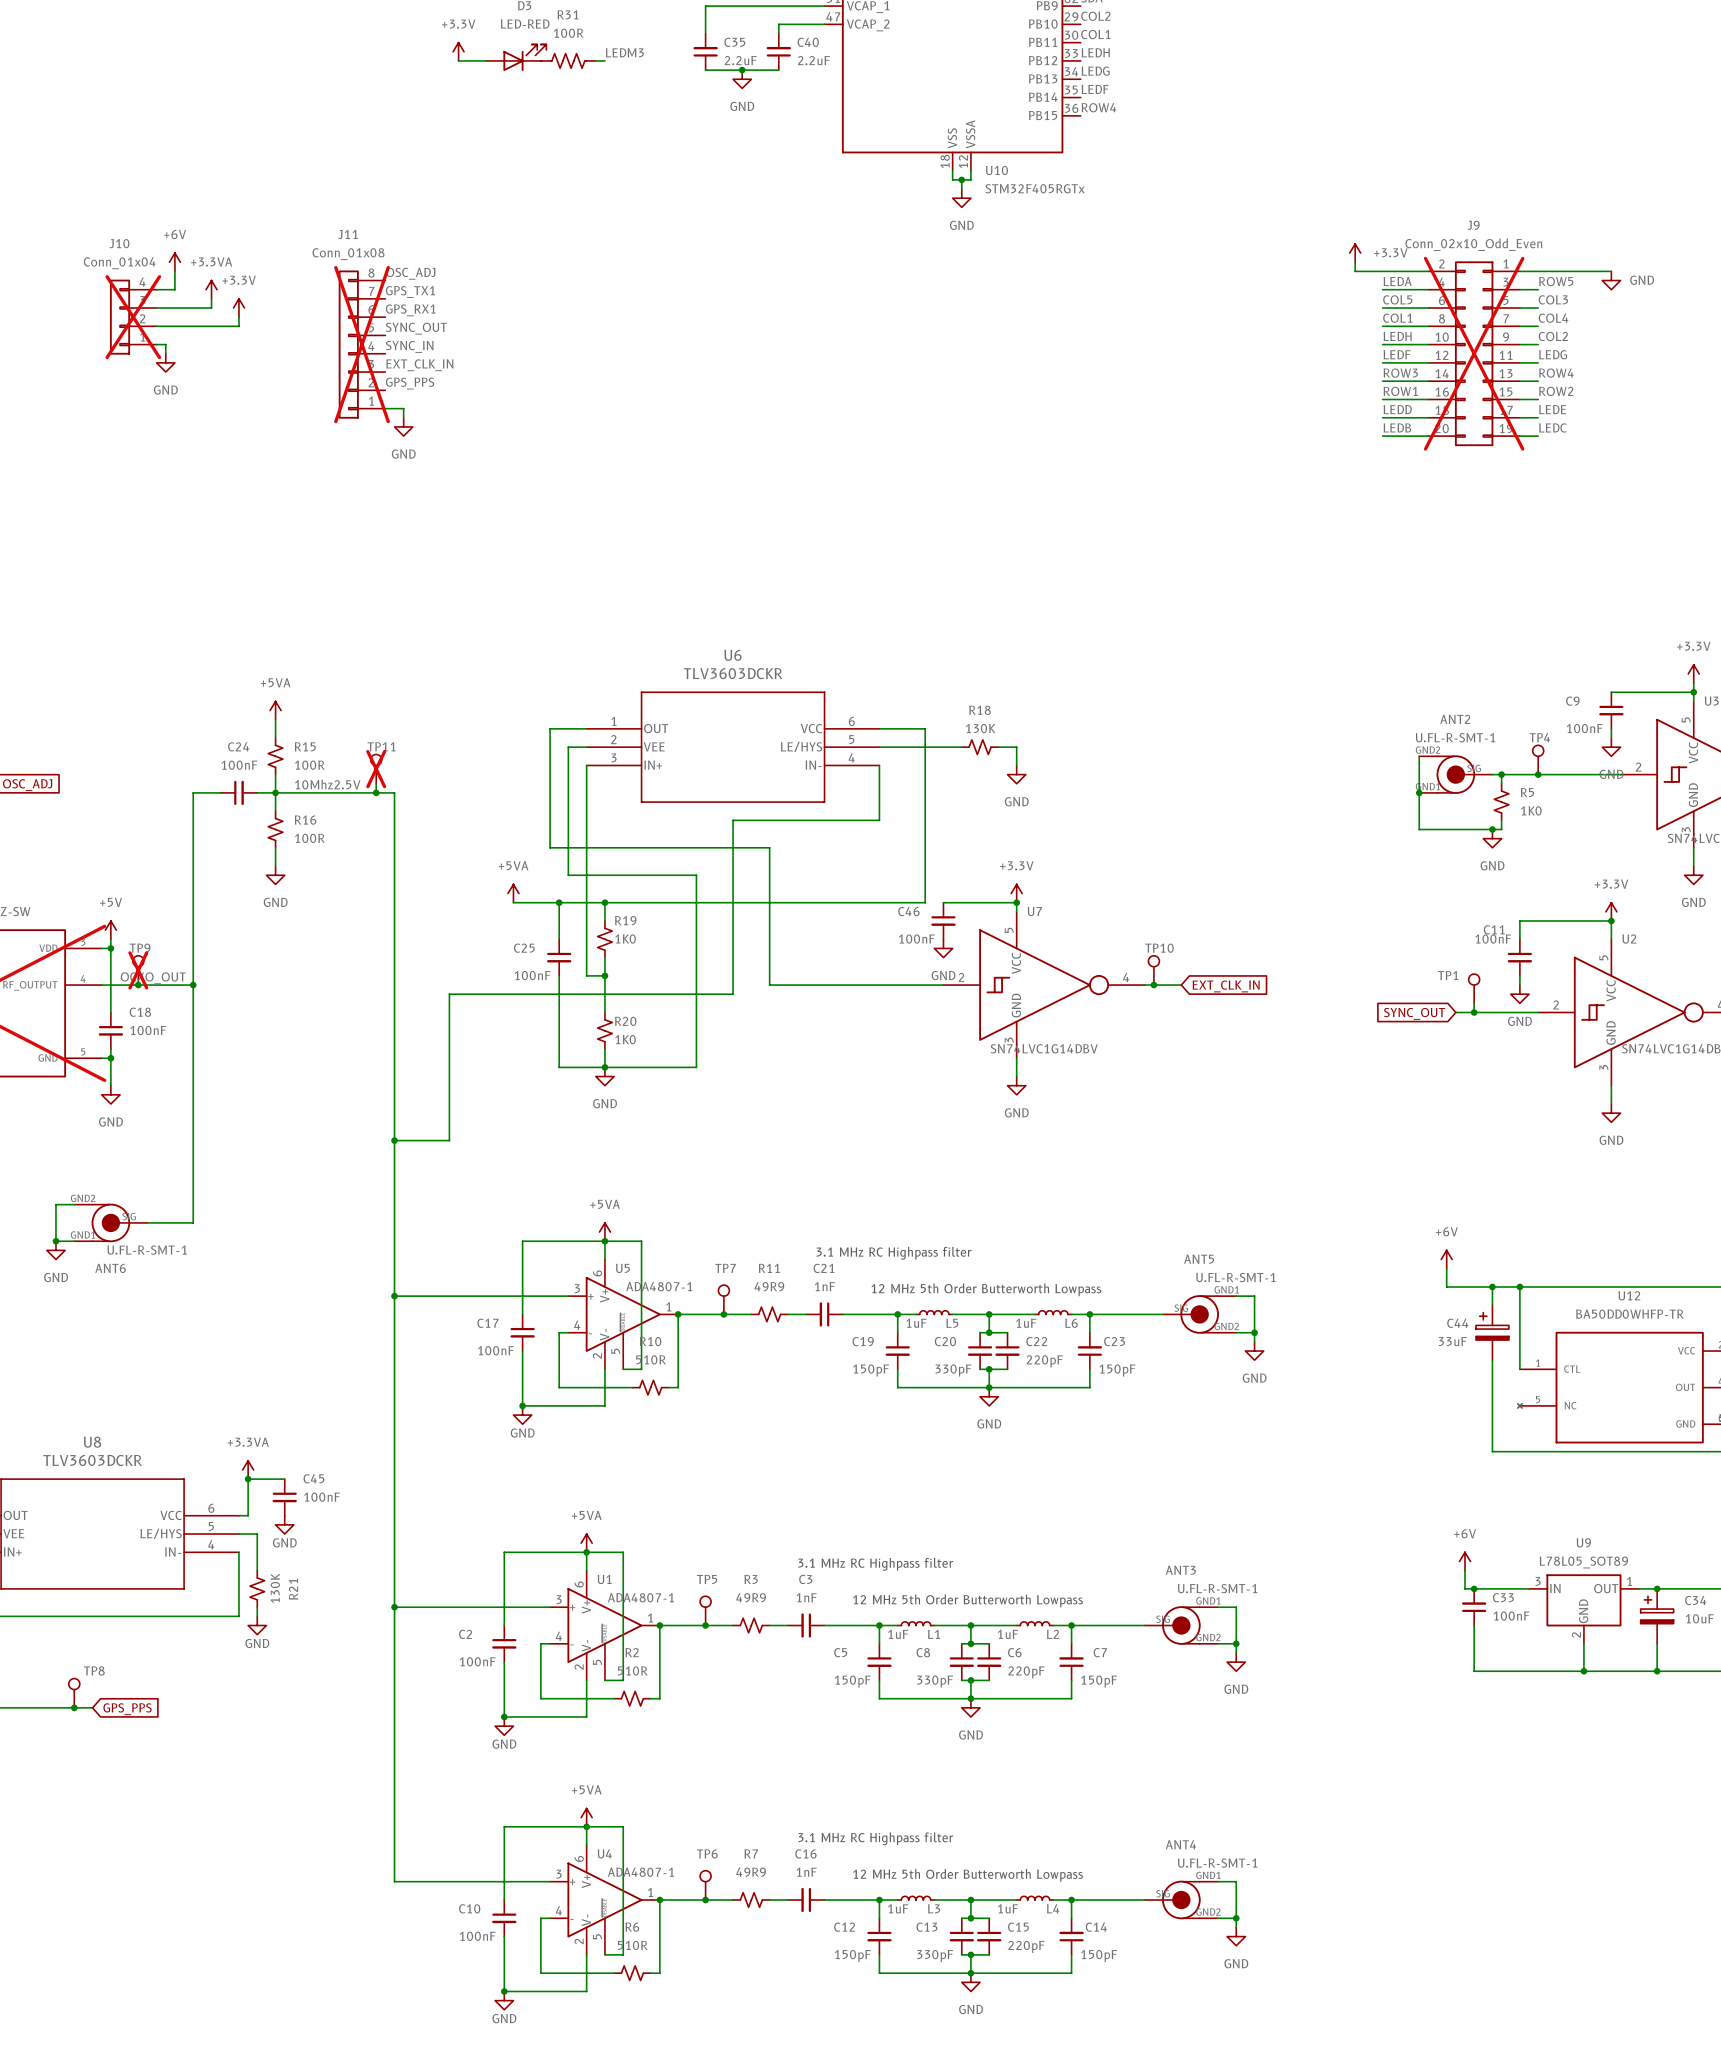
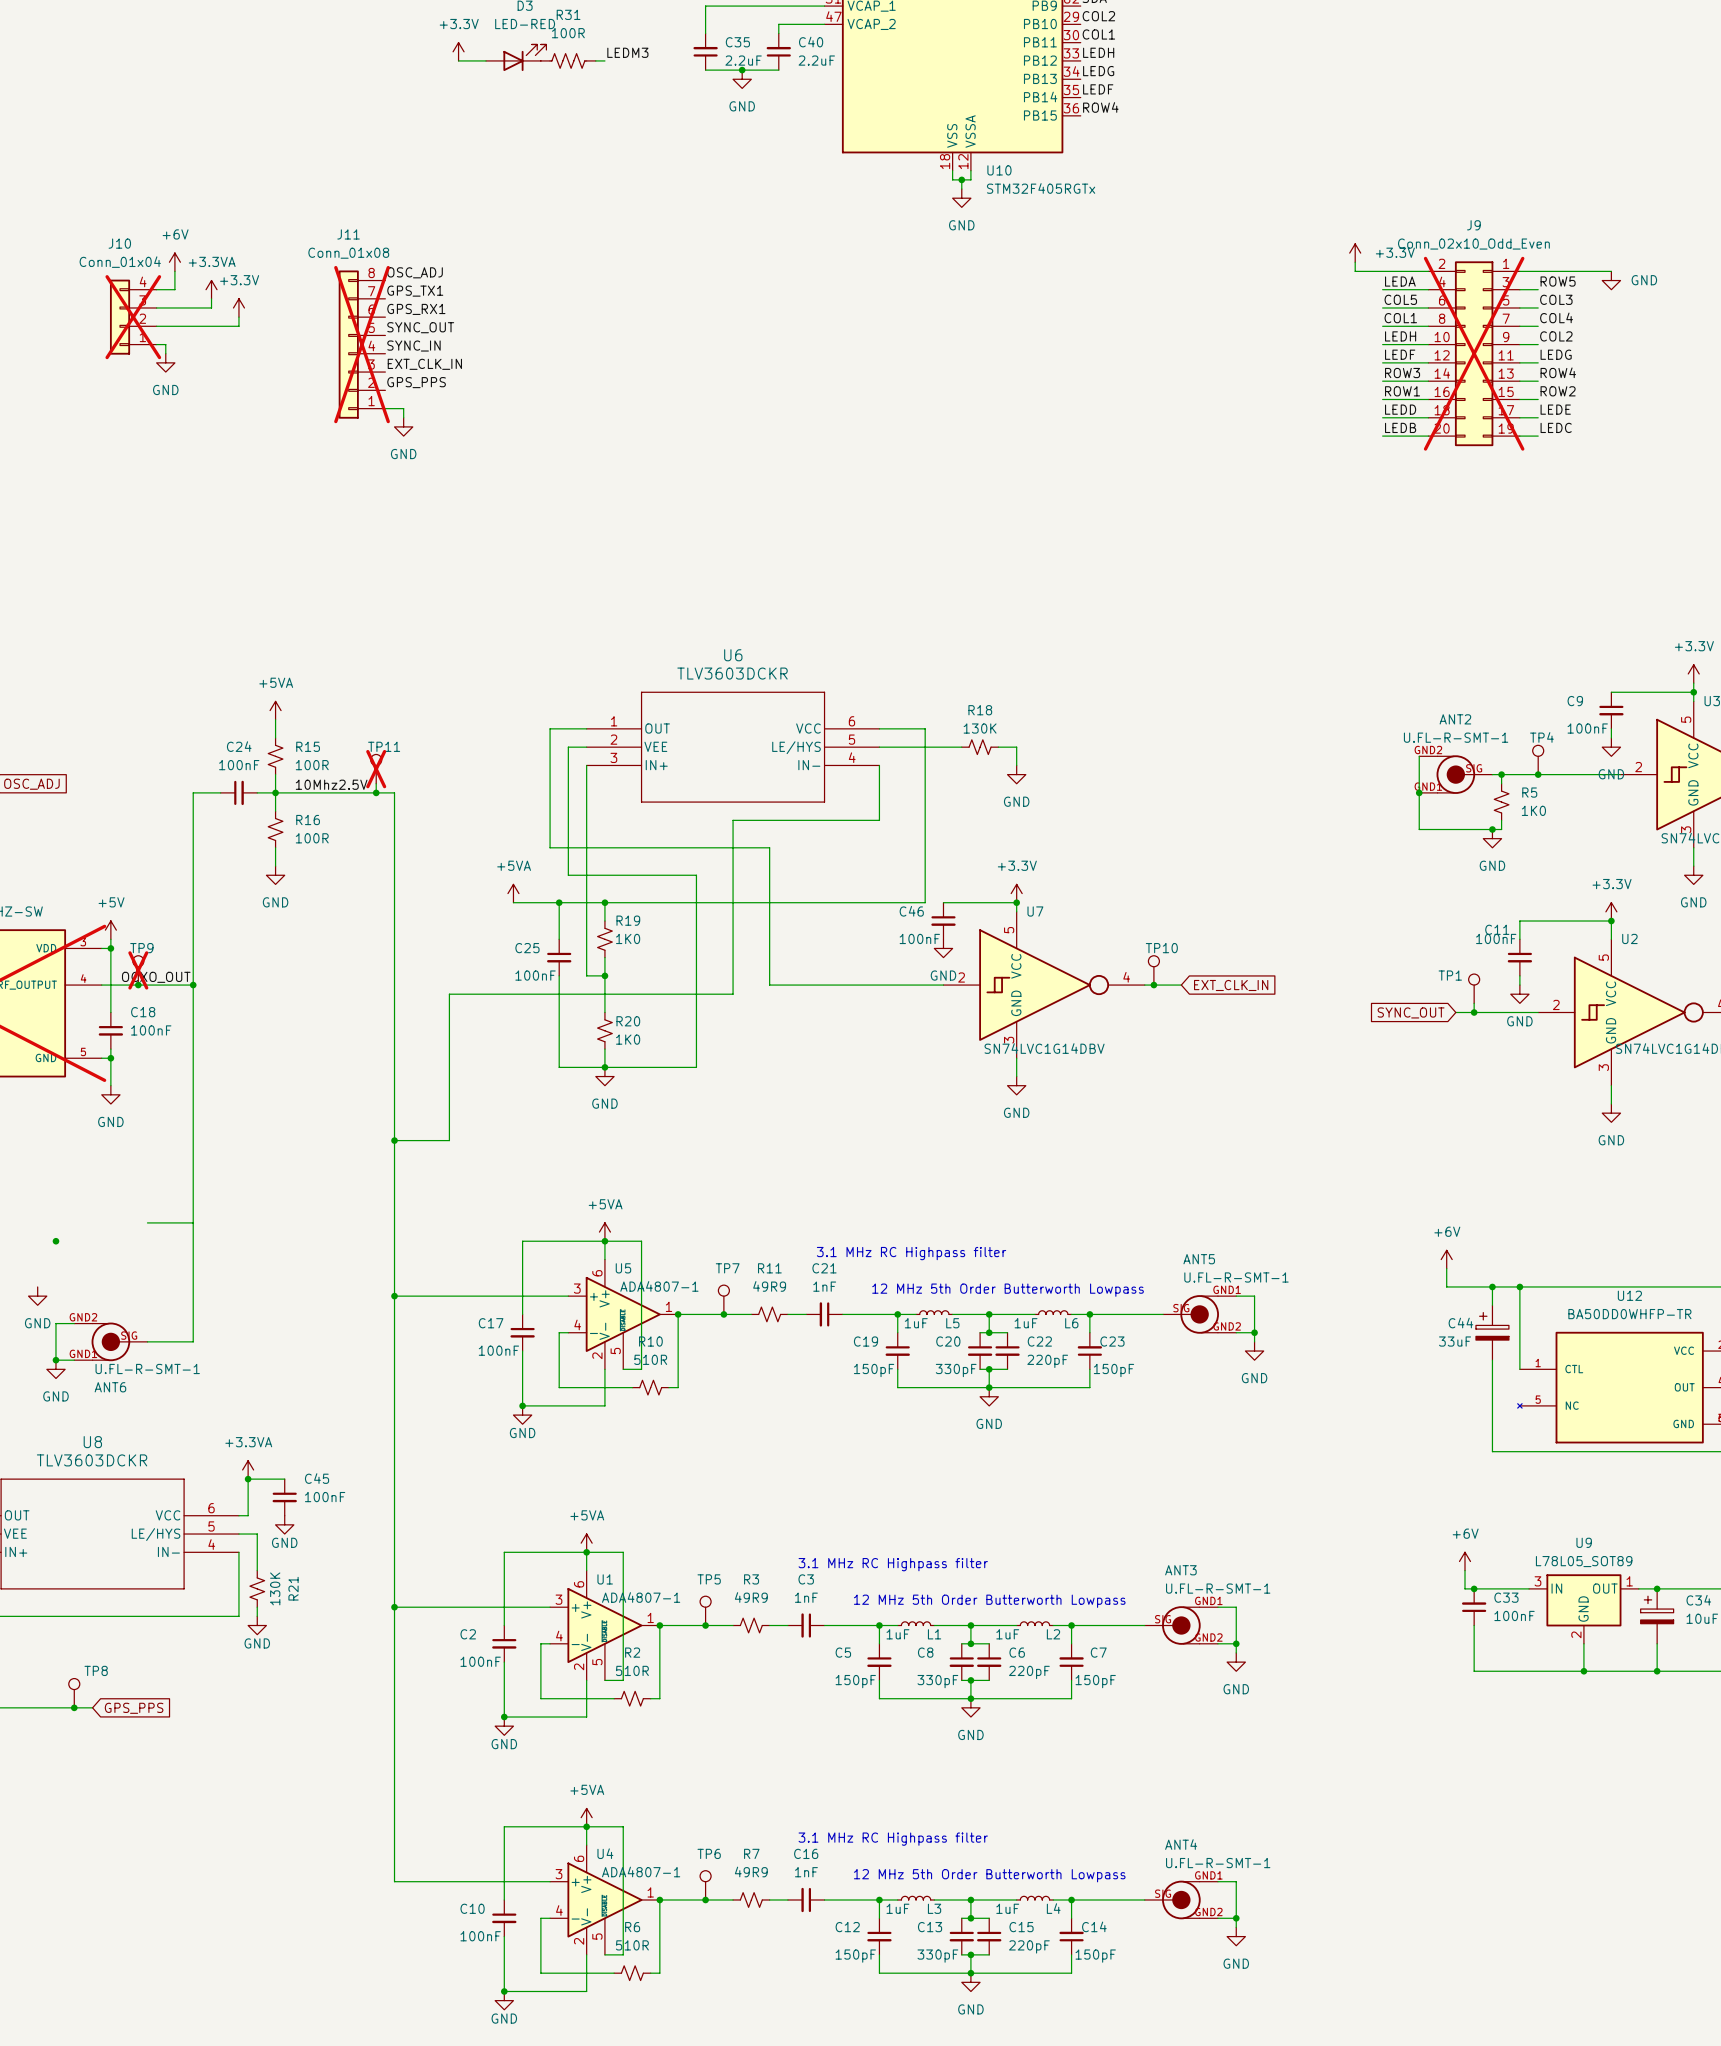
wire: (74, 1204) (55, 1204) (55, 1241) (74, 1241) -> (74, 1323) (55, 1323) (55, 1360) (74, 1360)
ANT6 position: (110, 1222) -> (110, 1341)
wire: none -> (193, 1222) (193, 1341) (147, 1341)
power symbol position: GND (55, 1250) -> GND (37, 1296)
junction: none -> (55, 1360)
power symbol: none -> GND (55, 1369)

